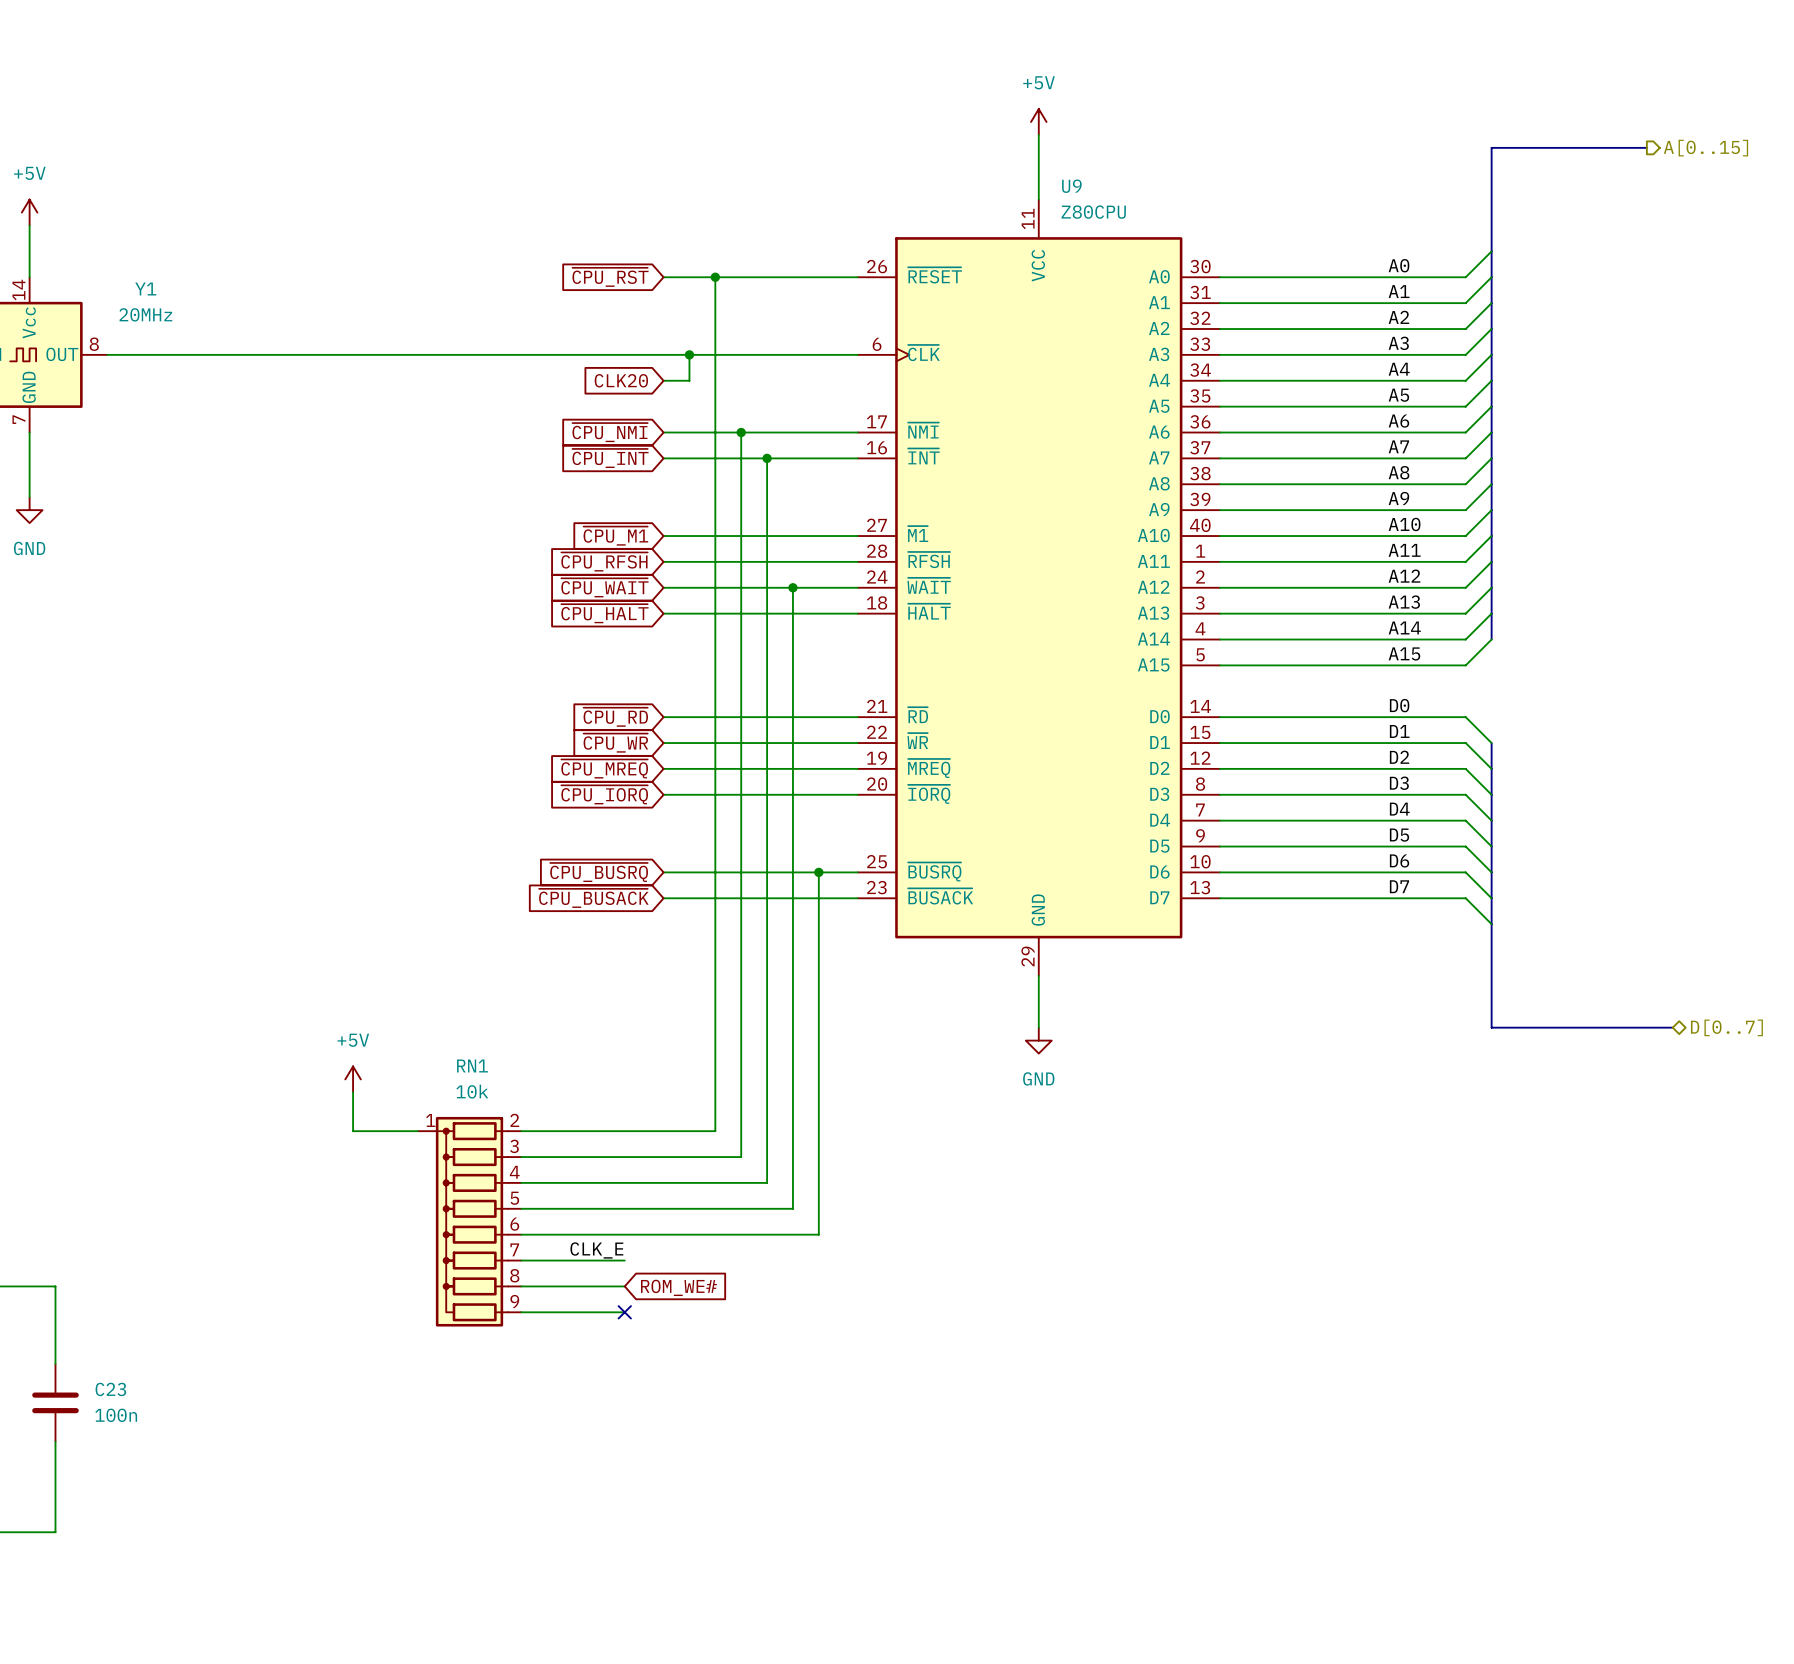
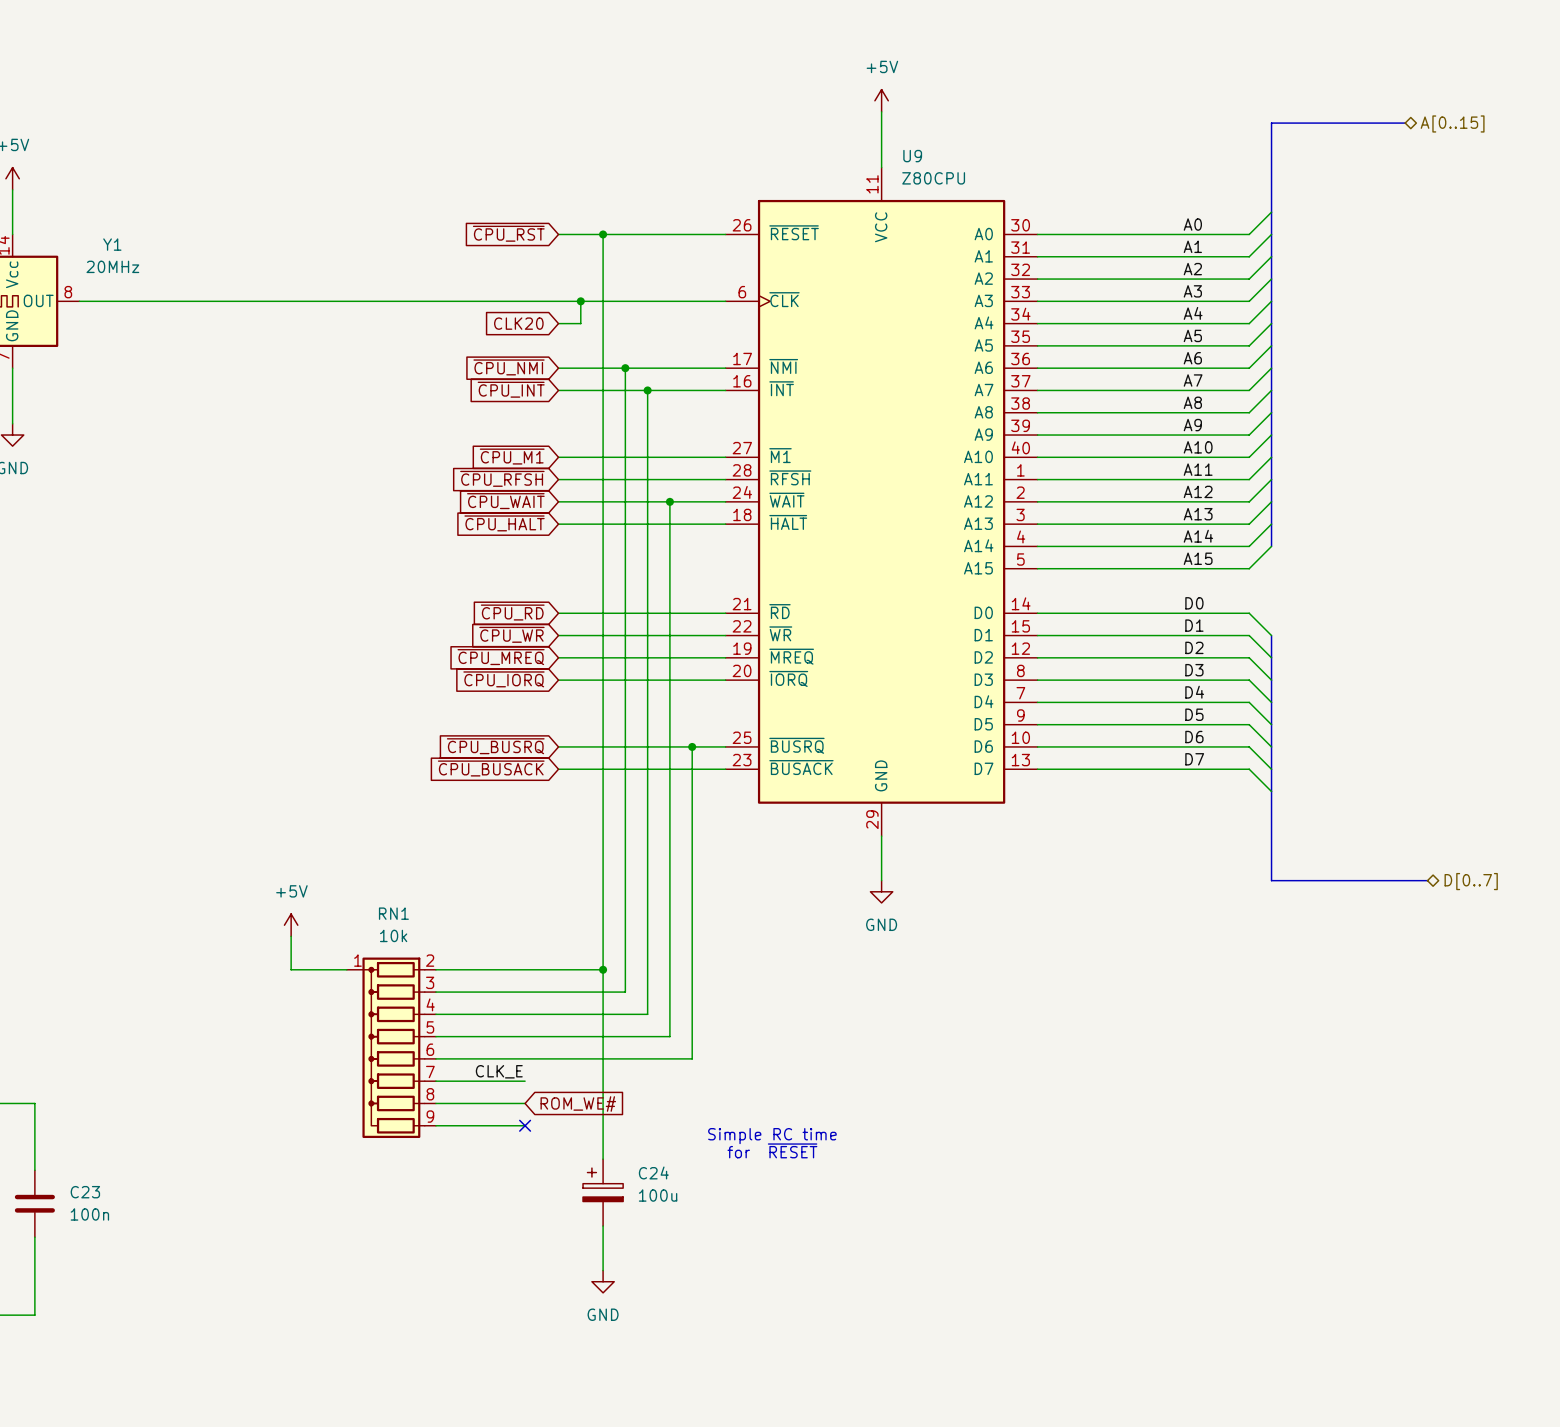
hierarchical label shape: output (1706, 148) -> bidirectional (1452, 123)
wire: none -> (603, 969) (603, 1159)
junction: none -> (603, 969)
text: none -> Simple RC time (772, 1136)
text: none -> for ~{RESET} (772, 1150)
C24: none -> 100u (603, 1192)
wire: none -> (603, 1226) (603, 1270)
power symbol: none -> GND (603, 1281)

